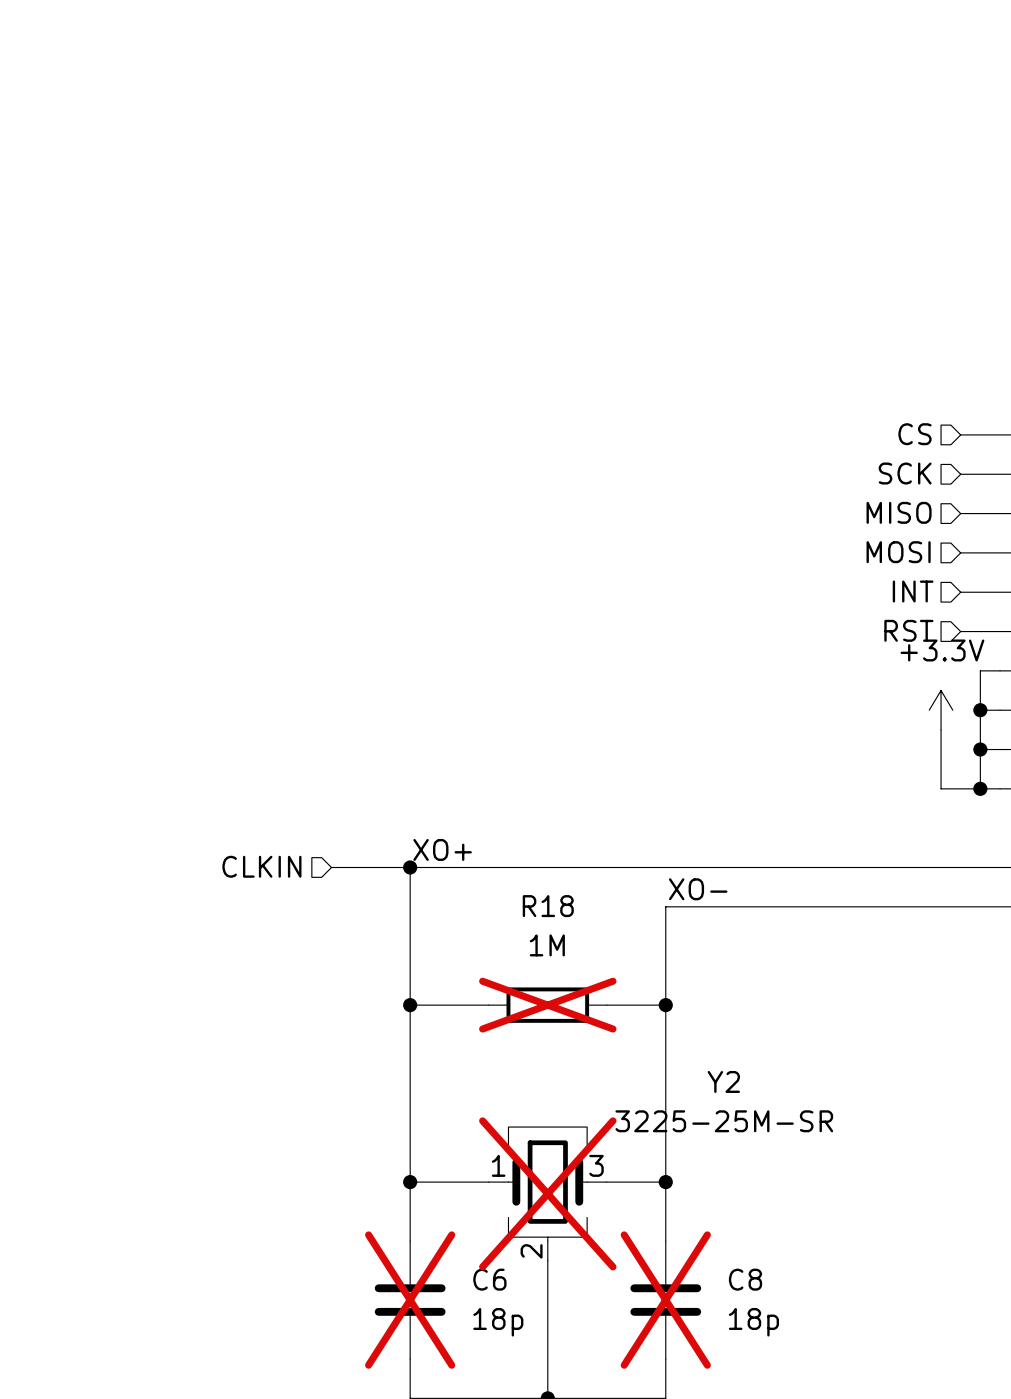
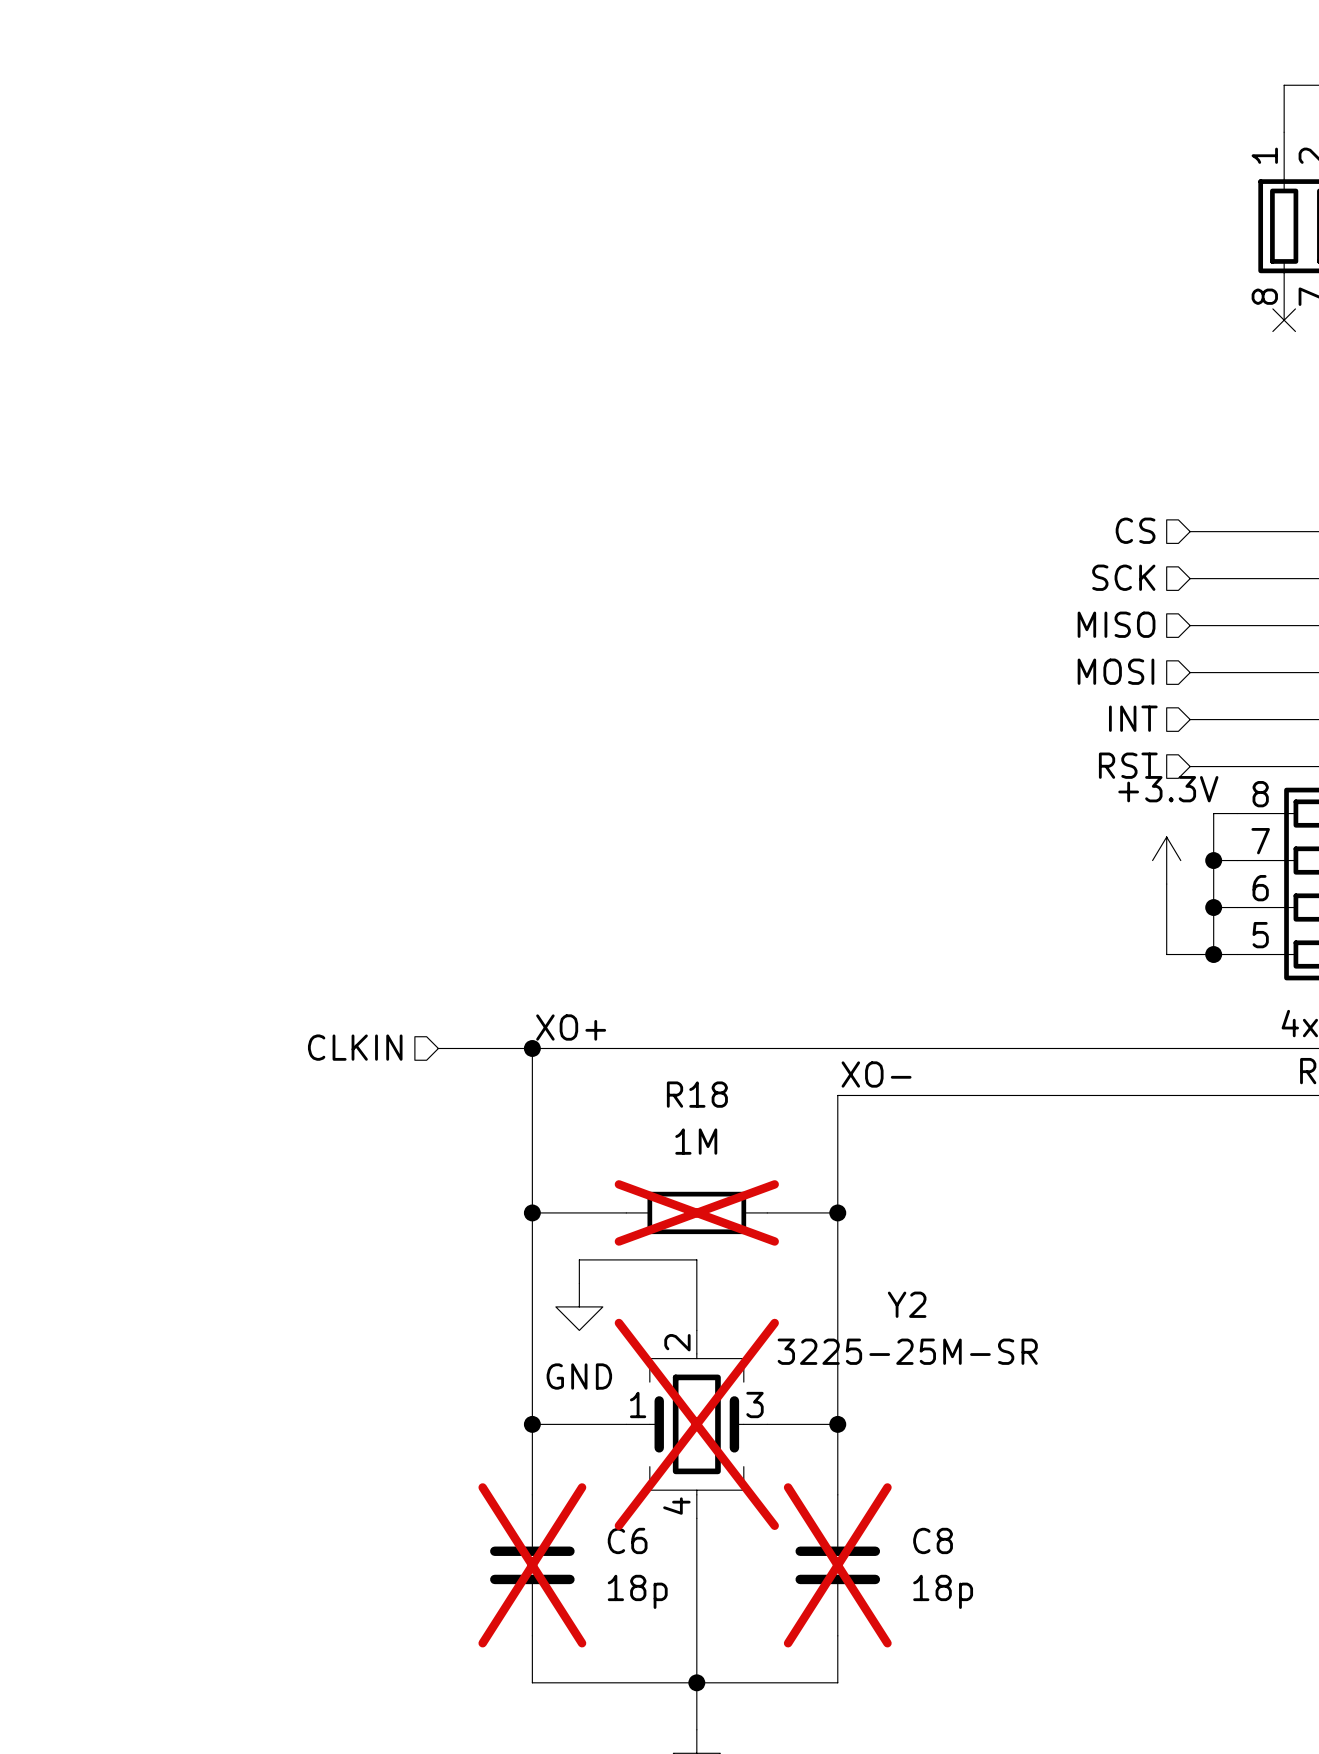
wire: none -> (579, 1283) (579, 1259) (696, 1259) (696, 1330)
power symbol: none -> GND (579, 1306)
Y2 symbol: [488, 1127, 607, 1261] -> [626, 1330, 768, 1519]

